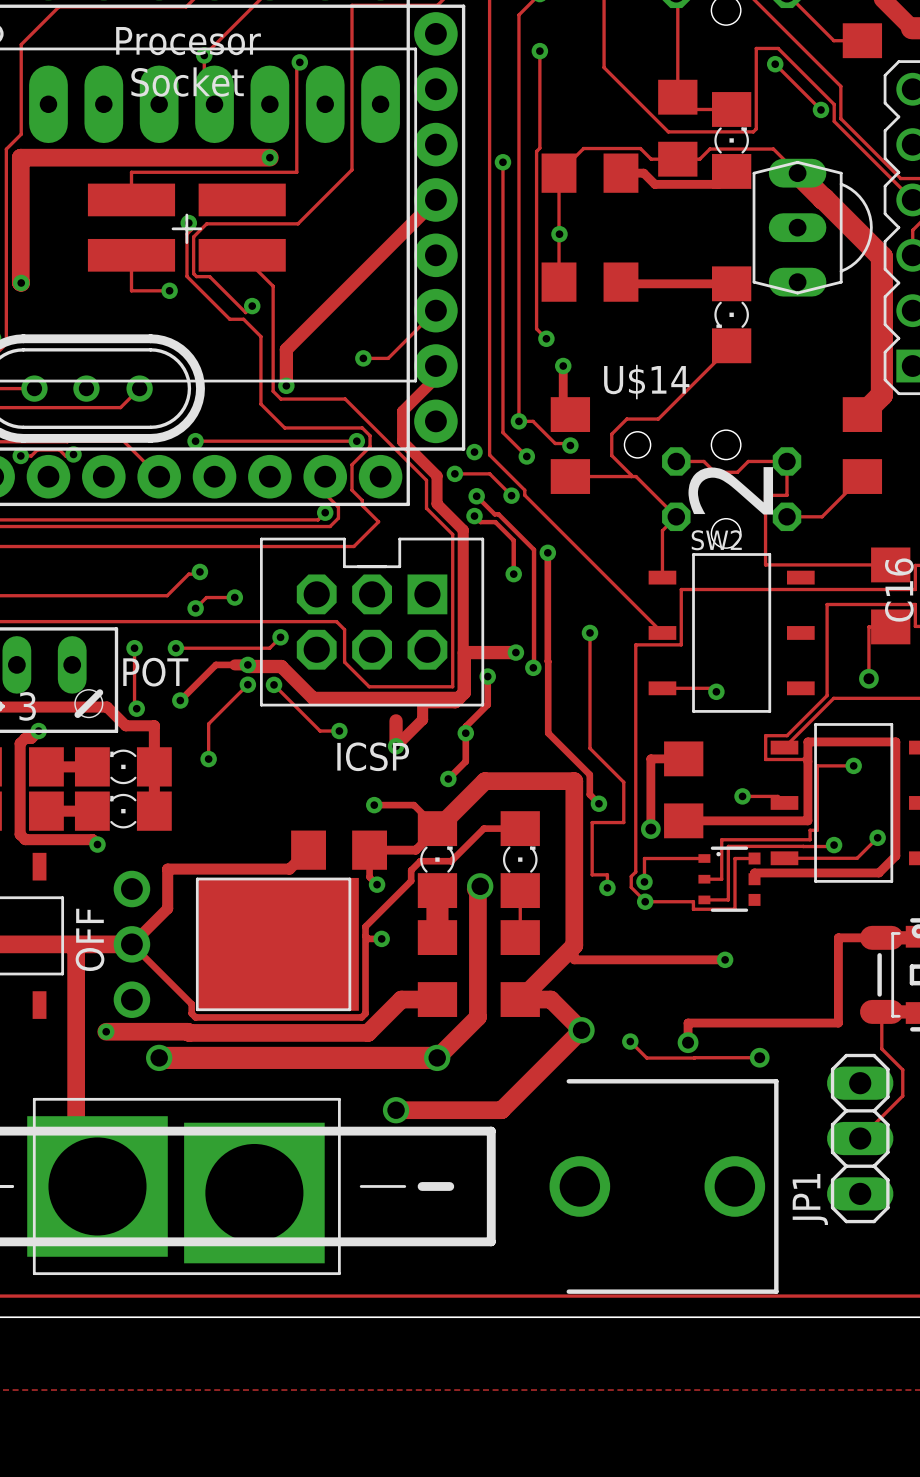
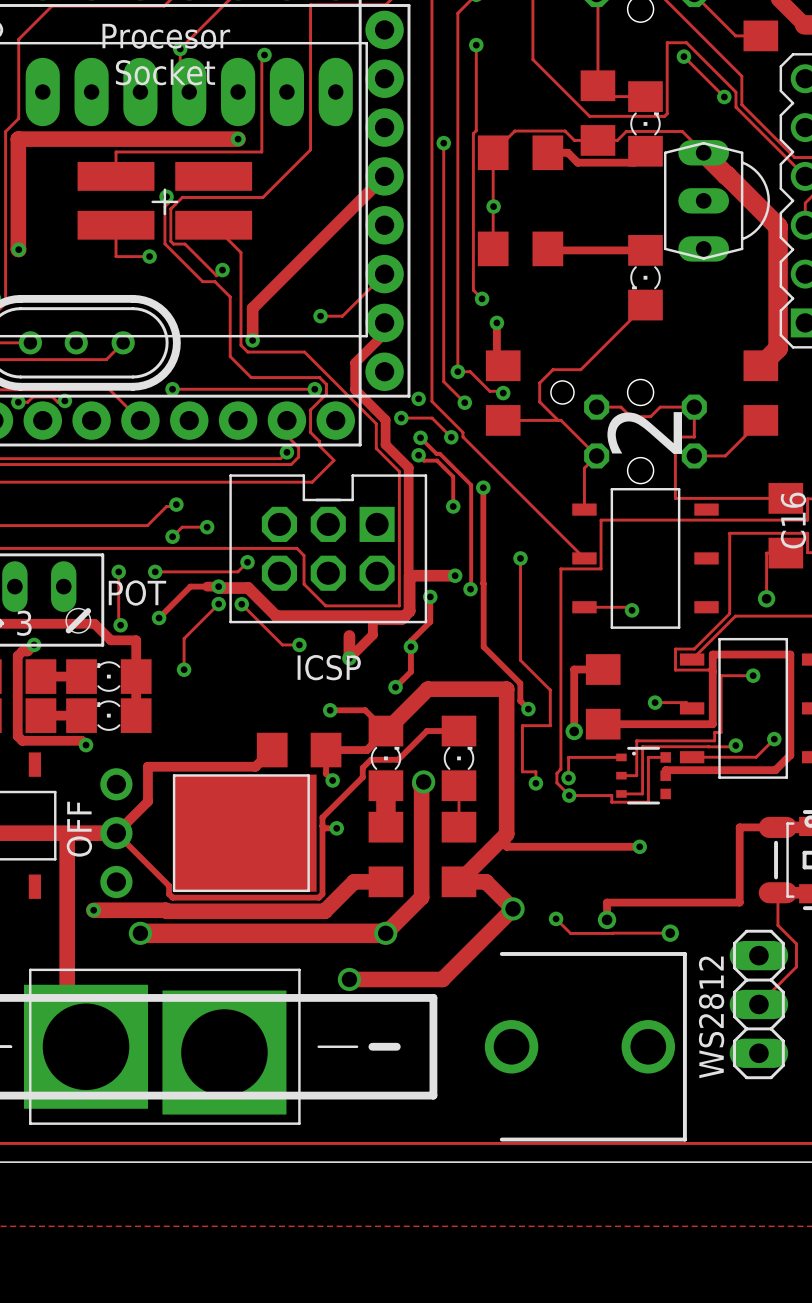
U$14 name: U$14 (646, 382) -> none
SW2 name: SW2 (716, 540) -> none
JP1 name: JP1 (810, 1199) -> WS2812 (711, 1017)

